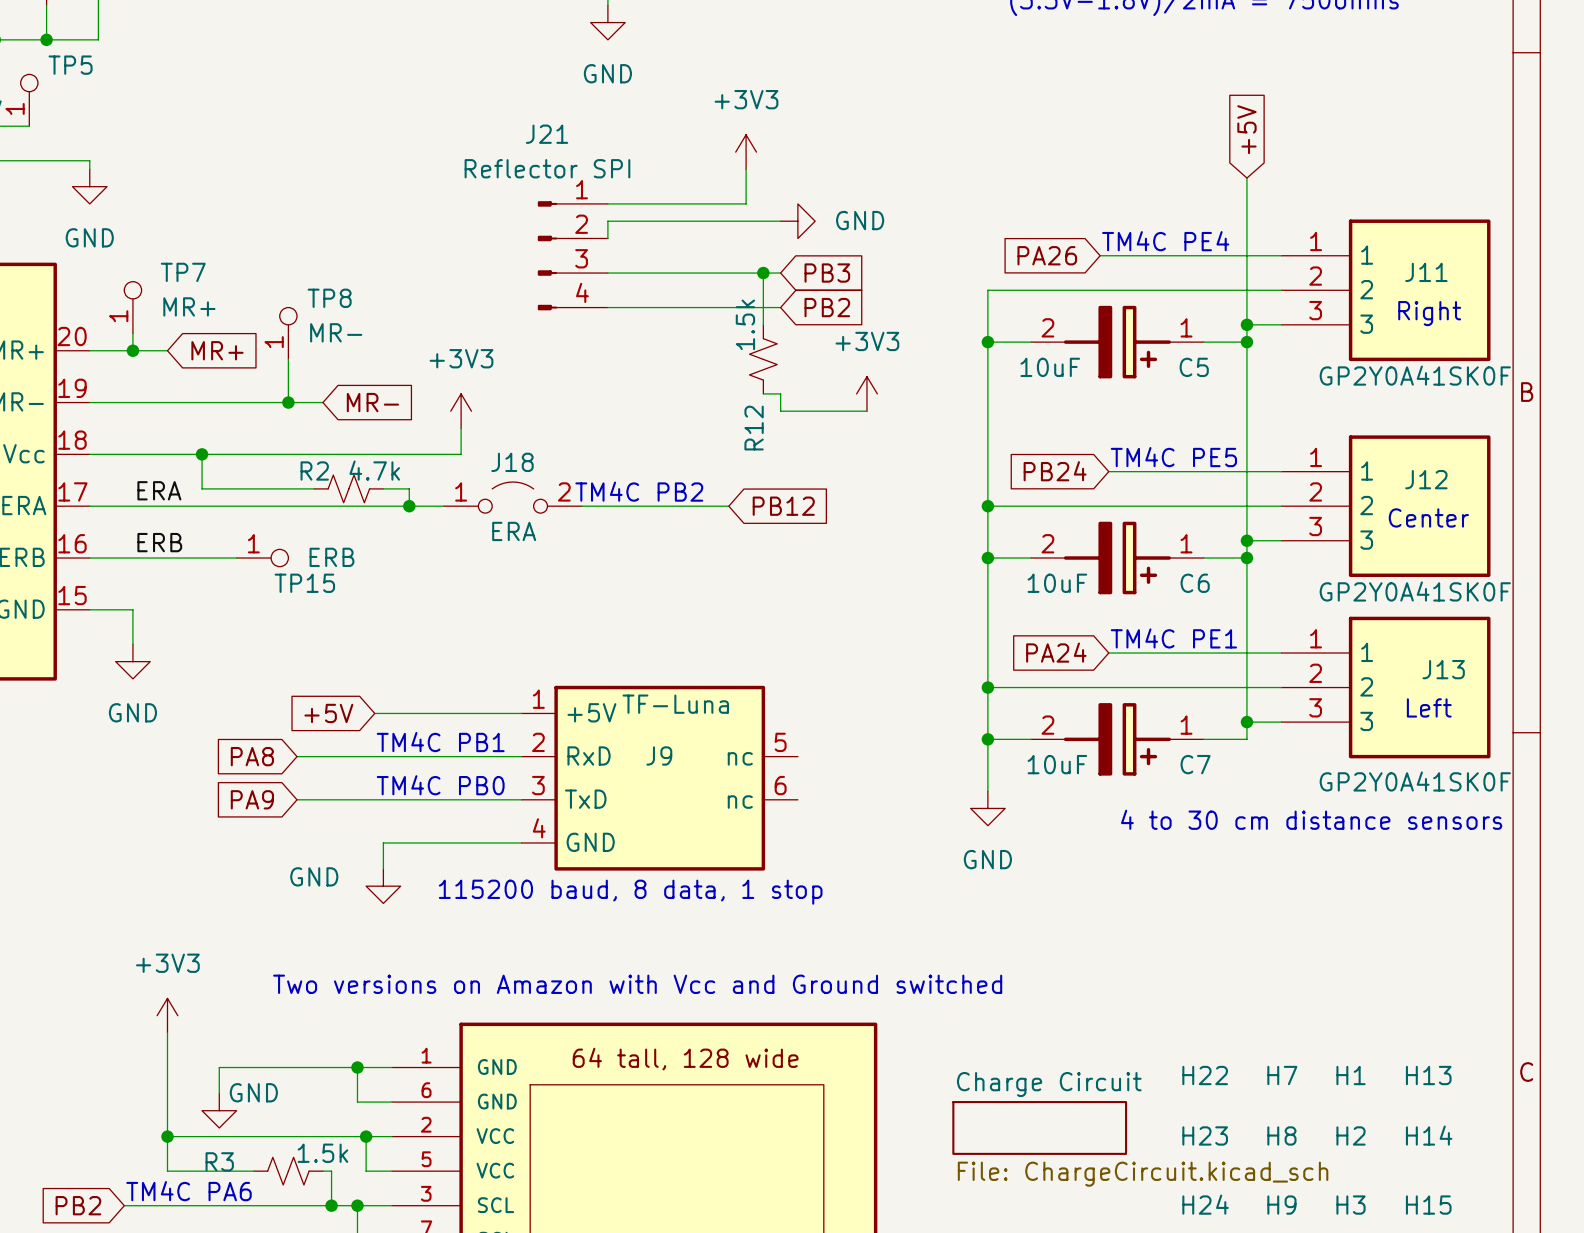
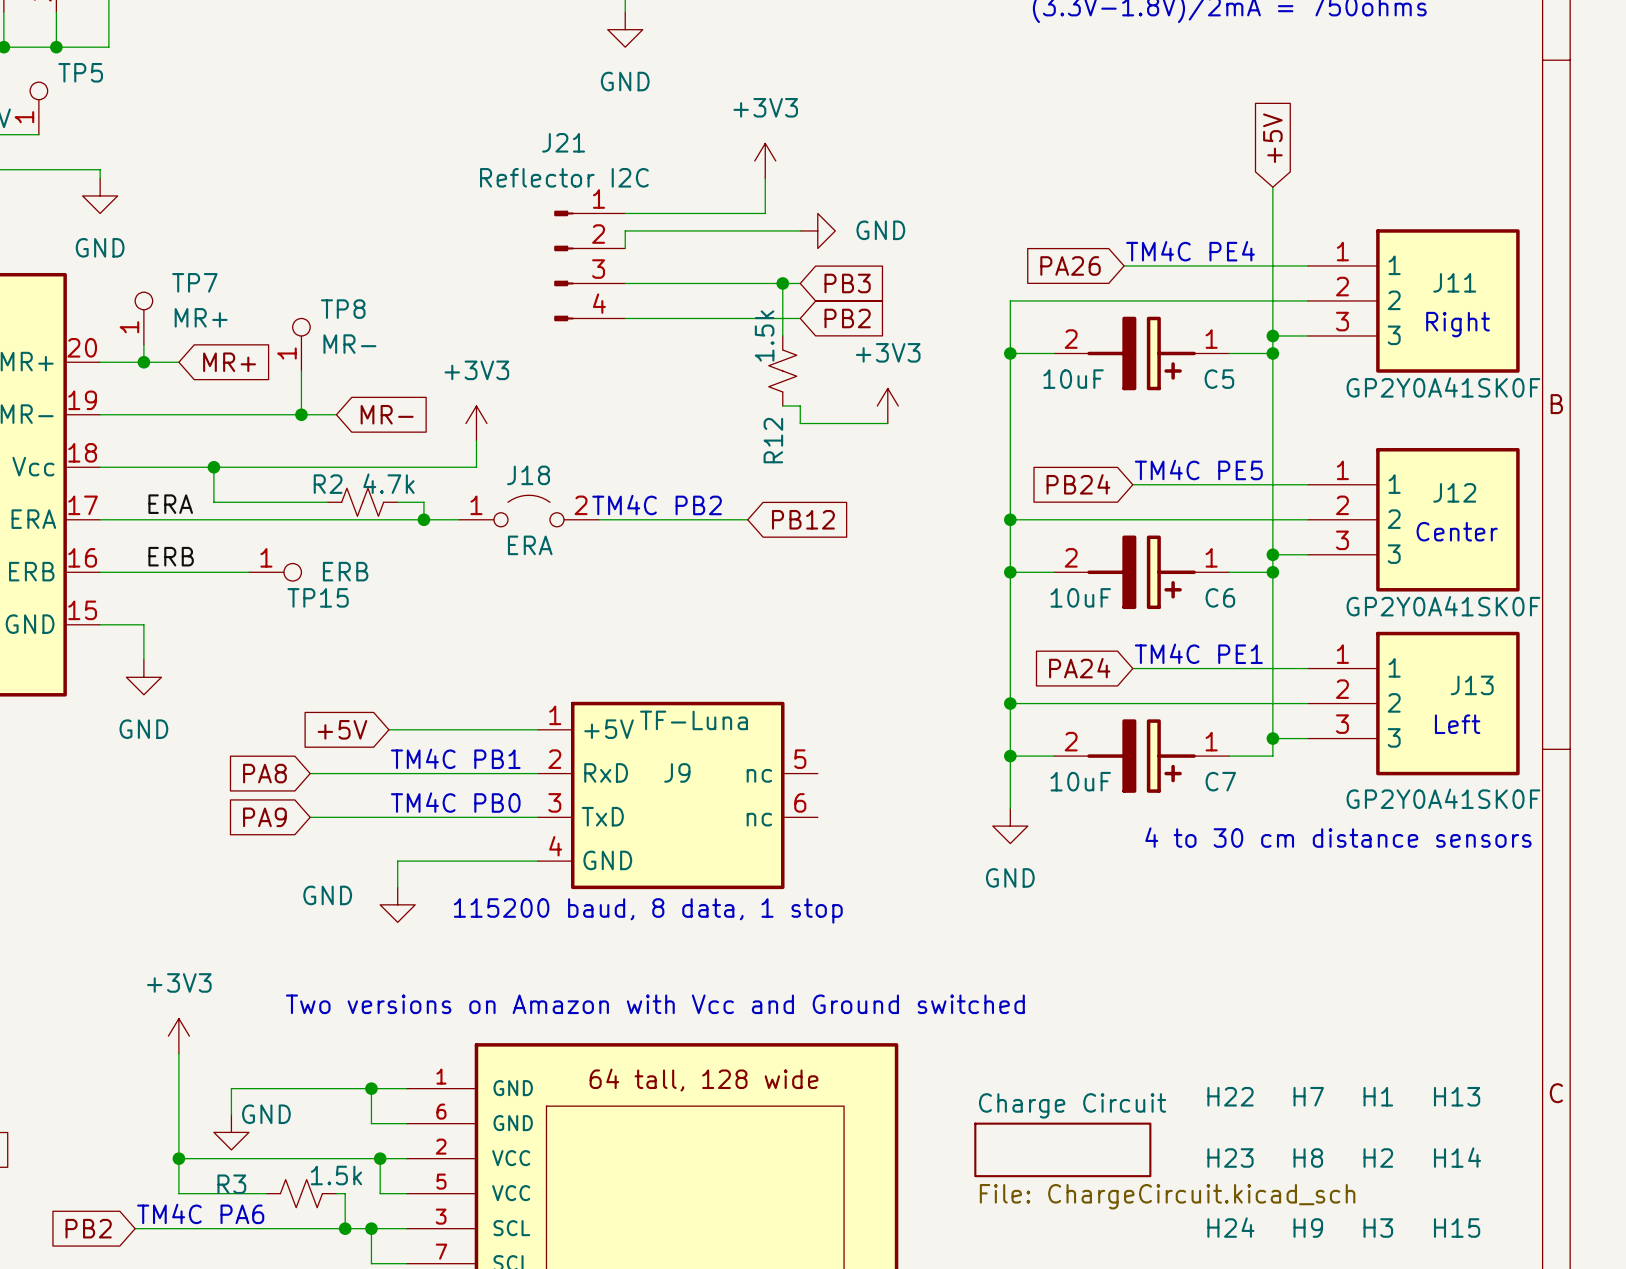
J21 value: Reflector SPI (547, 168) -> Reflector I2C (564, 177)

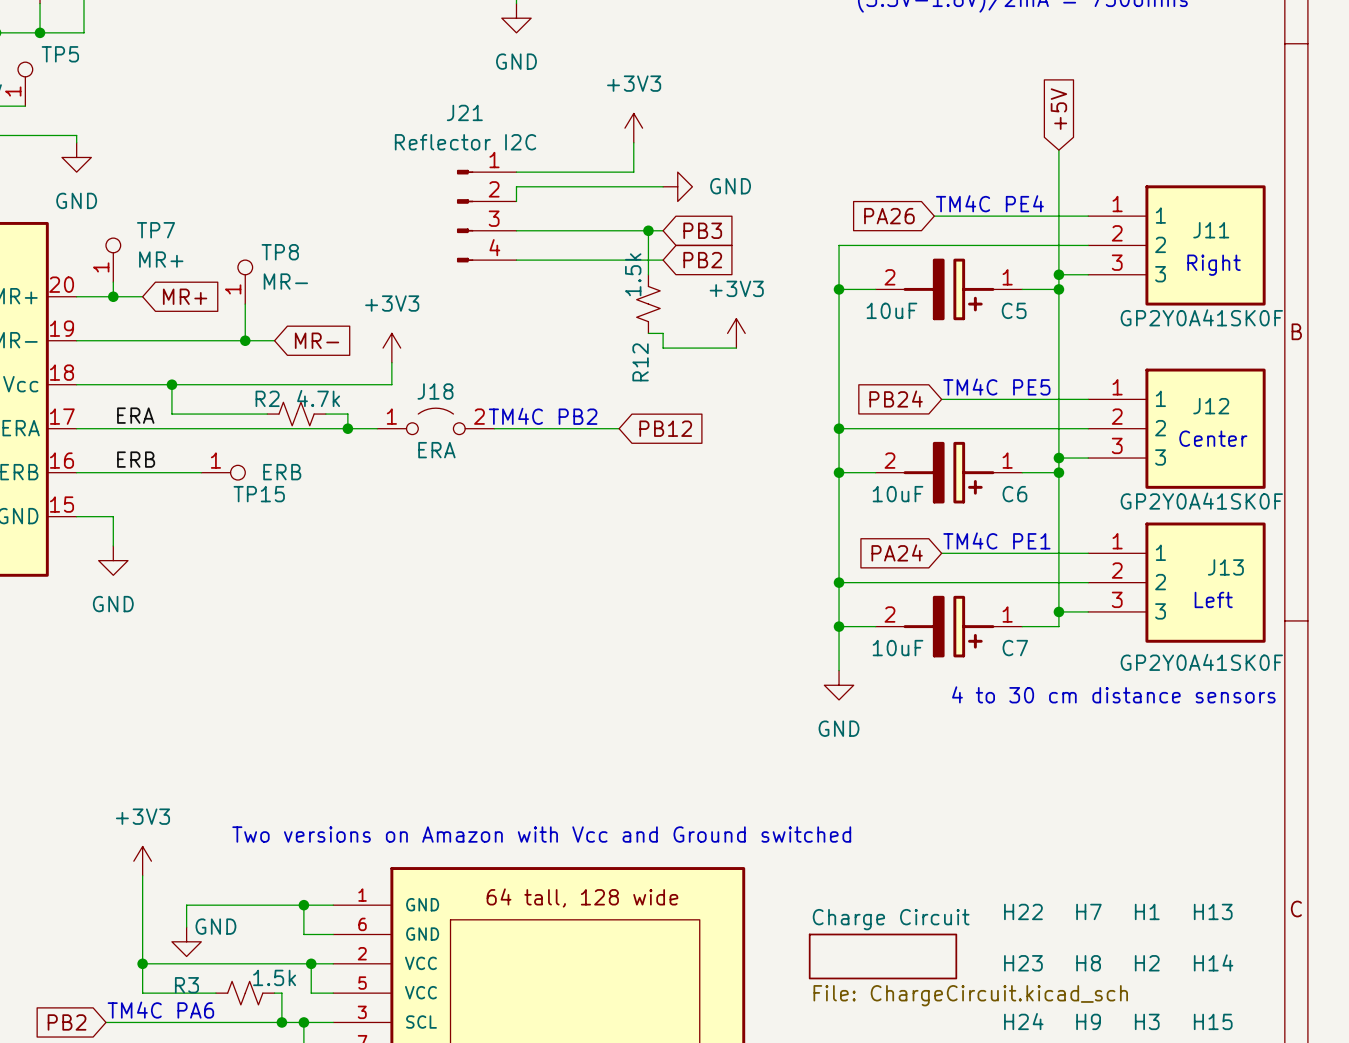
global label: +5V (342, 729) -> none
wire: (388, 729) (537, 729) -> none
text: TM4C PB1 (455, 758) -> none
global label: PA8 (264, 773) -> none
wire: (310, 773) (537, 773) -> none
J9: TF-Luna (677, 795) -> none
text: TM4C PB0 (455, 802) -> none
global label: PA9 (264, 817) -> none
wire: (310, 817) (537, 817) -> none
wire: (537, 861) (397, 861) (397, 887) -> none
power symbol: GND (397, 904) -> none
text: 115200 baud, 8 data, 1 stop (648, 910) -> none

